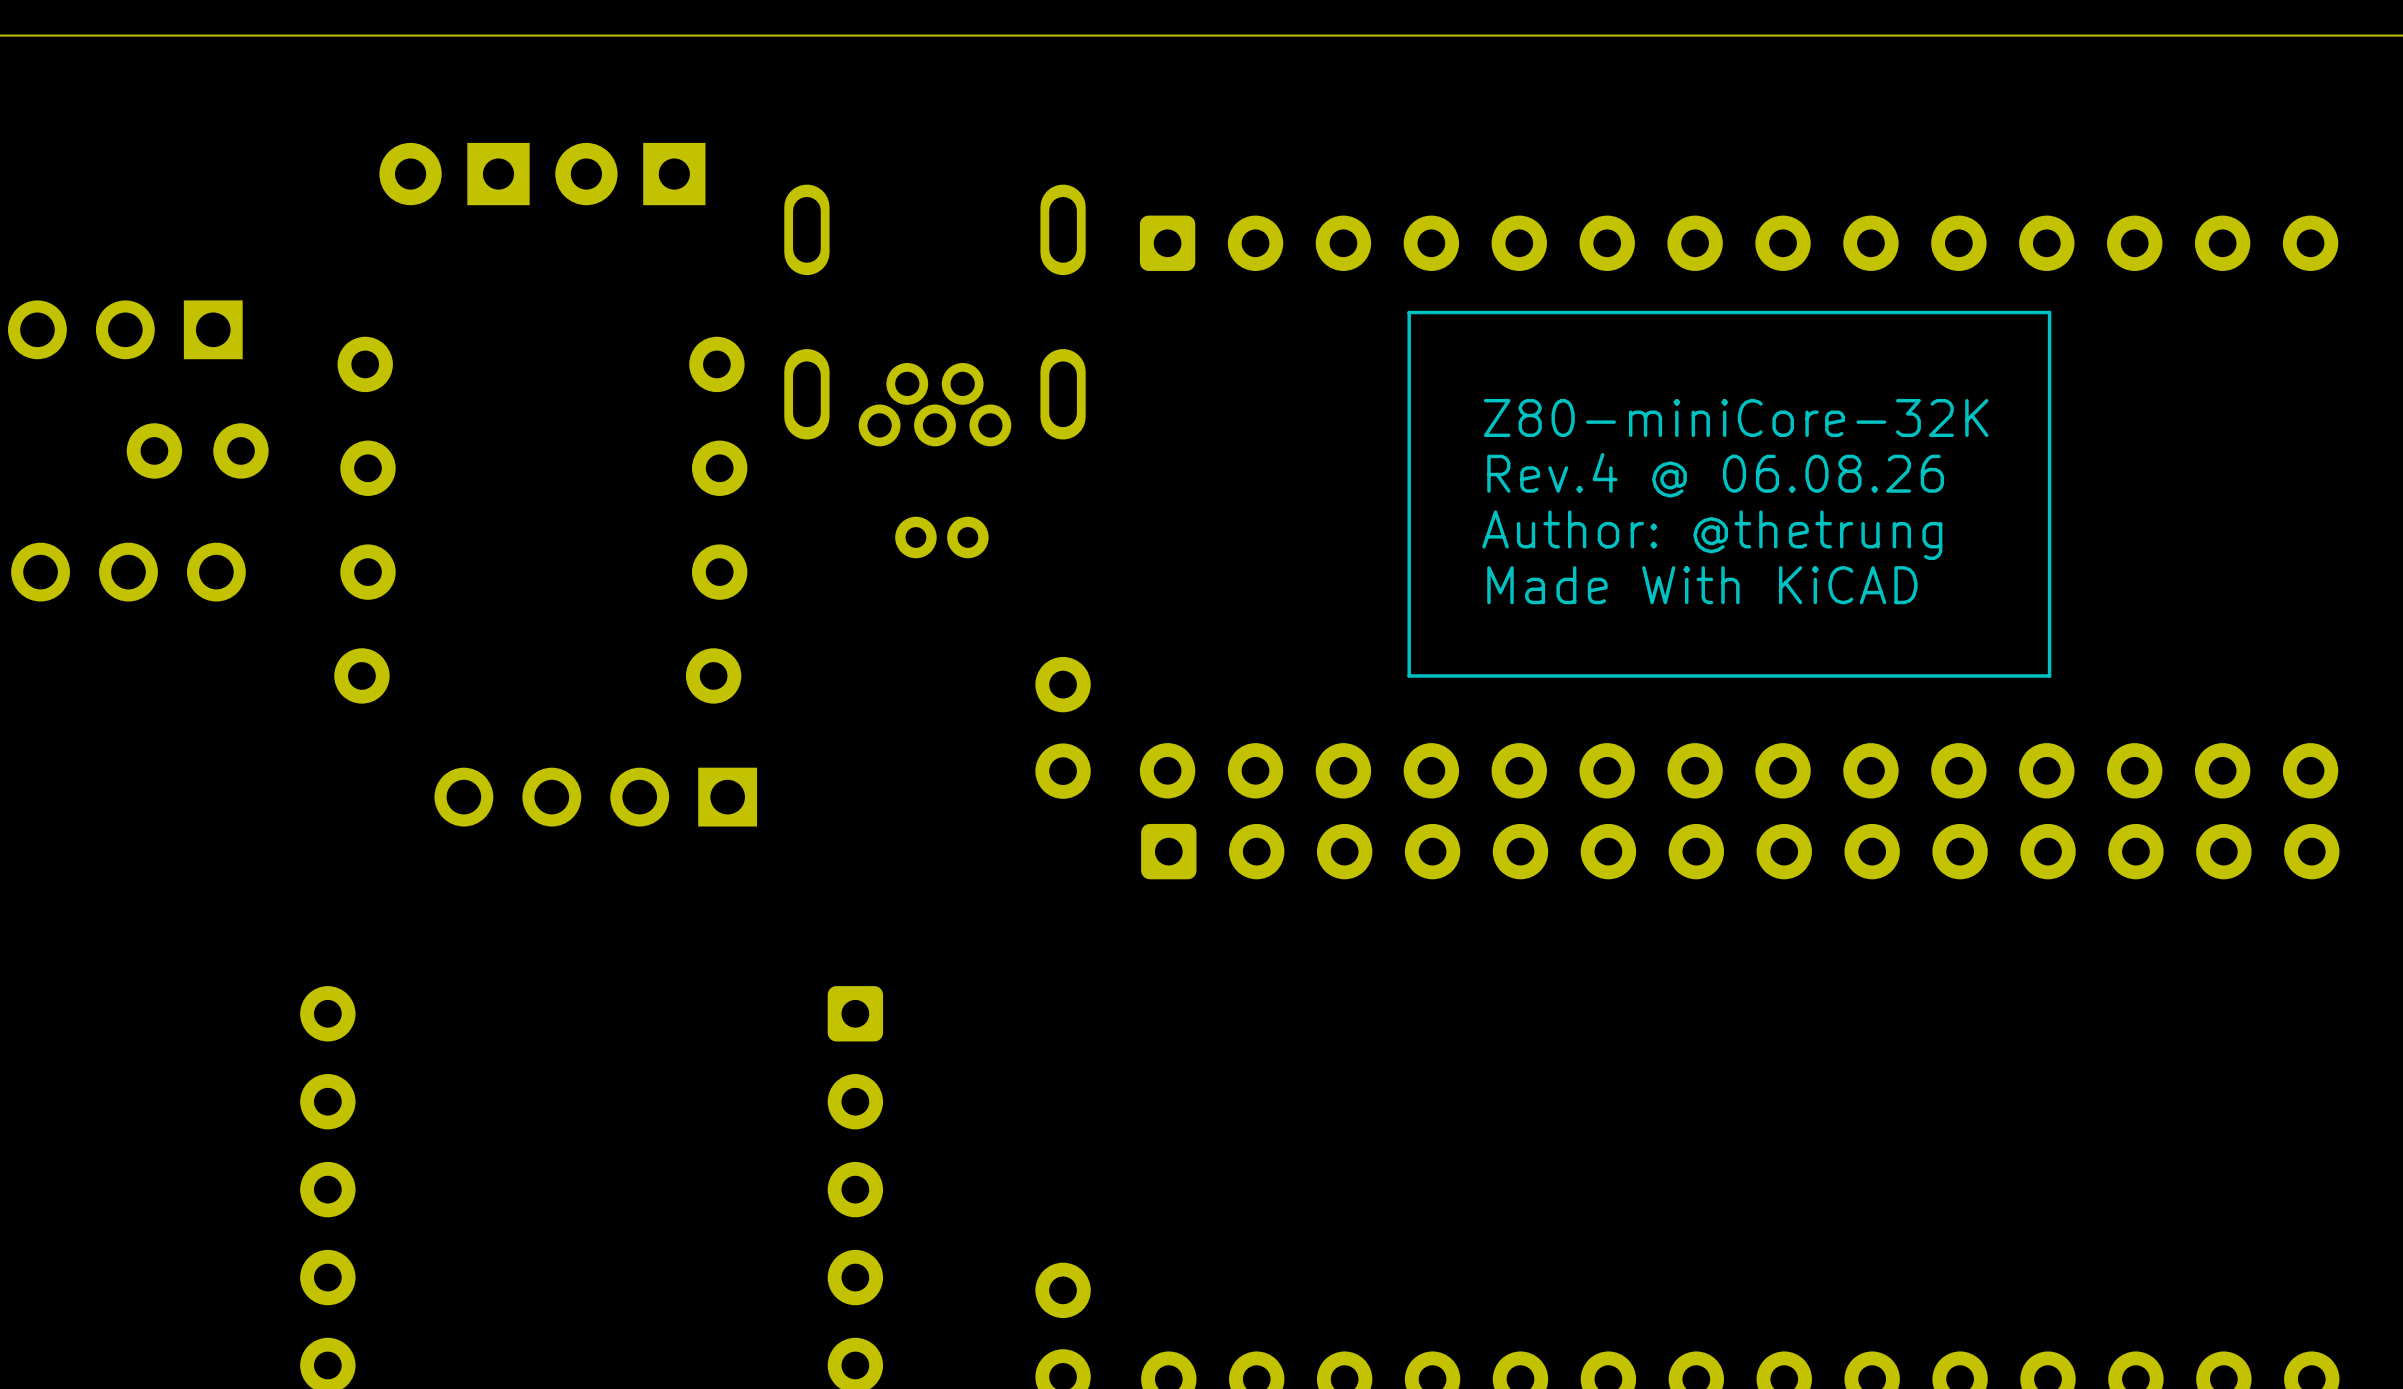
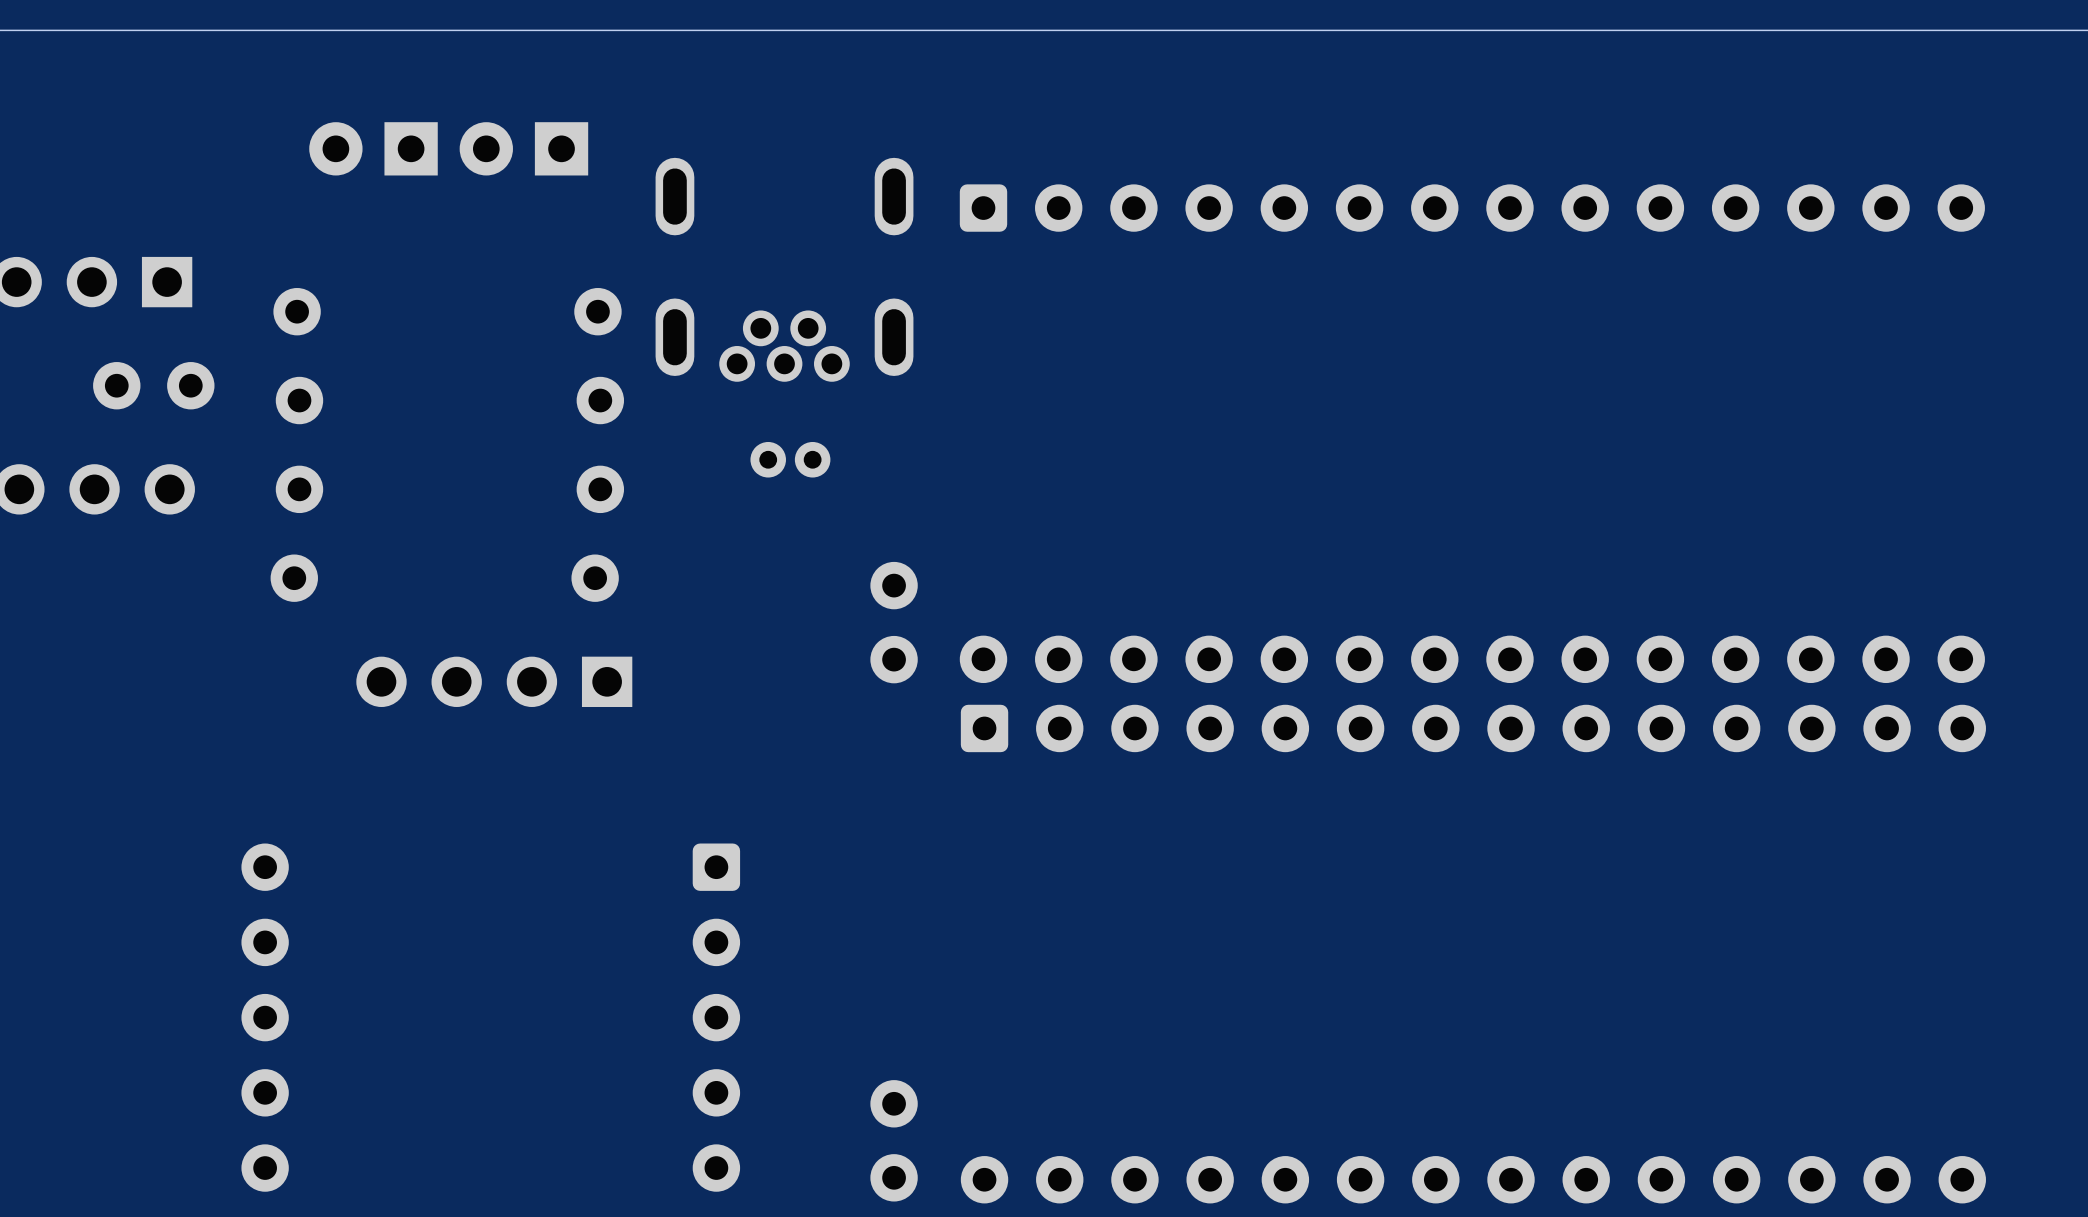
line: (2049, 312) (1409, 312) (1409, 675) (2049, 675) (2049, 312) -> none
text: Z80-miniCore-32K (1736, 417) -> none
text: Rev.4 @ 06.08.26 (1715, 475) -> none
text: Author: @thetrung (1712, 535) -> none
text: Made With KiCAD (1702, 585) -> none

